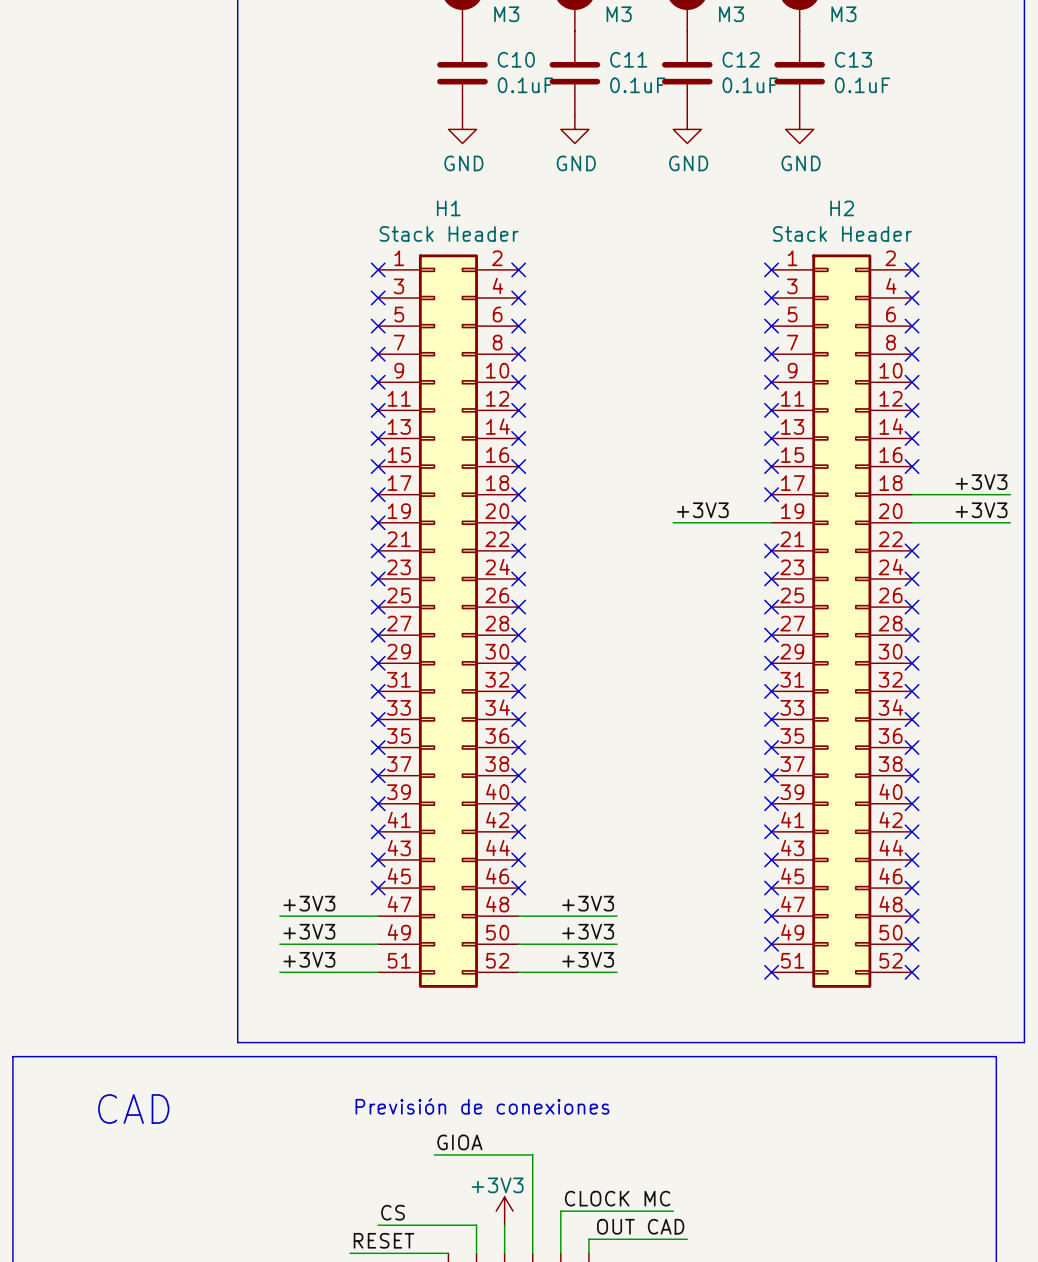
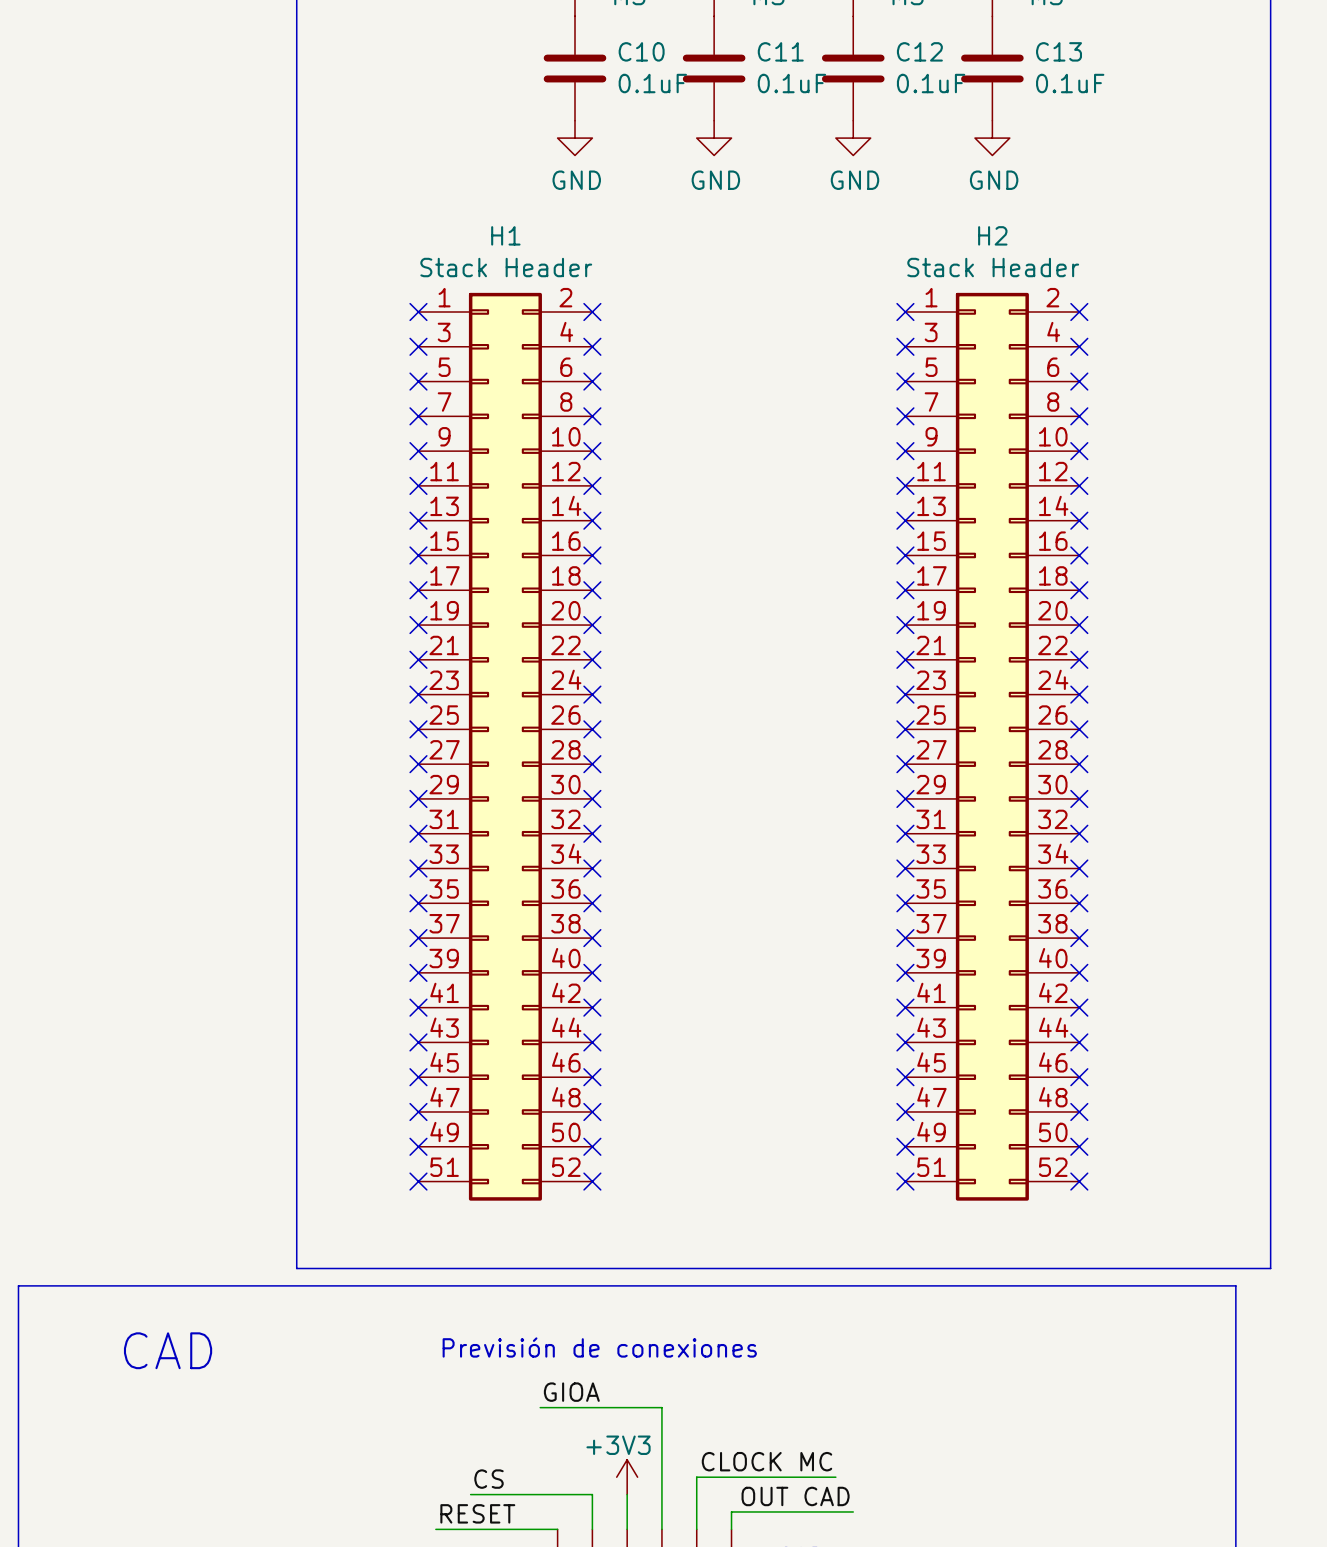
no-connect mark: none -> (418, 311)
no-connect mark: (378, 269) -> none
no-connect mark: none -> (592, 311)
no-connect mark: (518, 269) -> none
no-connect mark: none -> (905, 311)
no-connect mark: (771, 269) -> none
no-connect mark: none -> (1079, 311)
no-connect mark: (912, 269) -> none
no-connect mark: none -> (418, 346)
no-connect mark: (378, 298) -> none
no-connect mark: none -> (592, 346)
no-connect mark: (518, 298) -> none
no-connect mark: none -> (905, 346)
no-connect mark: (771, 298) -> none
no-connect mark: none -> (1079, 346)
no-connect mark: (912, 298) -> none
no-connect mark: none -> (418, 381)
no-connect mark: (378, 326) -> none
no-connect mark: none -> (592, 381)
no-connect mark: (518, 326) -> none
no-connect mark: none -> (905, 381)
no-connect mark: (771, 326) -> none
no-connect mark: none -> (1079, 381)
no-connect mark: (912, 326) -> none
no-connect mark: none -> (418, 416)
no-connect mark: (378, 354) -> none
no-connect mark: none -> (592, 416)
no-connect mark: (518, 354) -> none
no-connect mark: none -> (905, 416)
no-connect mark: (771, 354) -> none
no-connect mark: none -> (1079, 416)
no-connect mark: (912, 354) -> none
no-connect mark: none -> (418, 451)
no-connect mark: (378, 382) -> none
no-connect mark: none -> (592, 451)
no-connect mark: (518, 382) -> none
no-connect mark: none -> (905, 451)
no-connect mark: (771, 382) -> none
no-connect mark: none -> (1079, 451)
no-connect mark: (912, 382) -> none
no-connect mark: none -> (418, 485)
no-connect mark: (378, 410) -> none
no-connect mark: none -> (592, 485)
no-connect mark: (518, 410) -> none
no-connect mark: none -> (905, 485)
no-connect mark: (771, 410) -> none
no-connect mark: none -> (1079, 485)
no-connect mark: (912, 410) -> none
no-connect mark: none -> (418, 520)
no-connect mark: (378, 438) -> none
no-connect mark: none -> (592, 520)
no-connect mark: (518, 438) -> none
no-connect mark: none -> (905, 520)
no-connect mark: (771, 438) -> none
no-connect mark: none -> (1079, 520)
no-connect mark: (912, 438) -> none
no-connect mark: none -> (418, 555)
no-connect mark: (378, 466) -> none
no-connect mark: none -> (592, 555)
no-connect mark: (518, 466) -> none
no-connect mark: none -> (905, 555)
no-connect mark: (771, 466) -> none
no-connect mark: none -> (1079, 555)
no-connect mark: (912, 466) -> none
label: +3V3 (981, 482) -> none
no-connect mark: none -> (418, 590)
no-connect mark: (378, 494) -> none
no-connect mark: none -> (592, 590)
no-connect mark: (518, 494) -> none
no-connect mark: none -> (905, 590)
no-connect mark: (771, 494) -> none
no-connect mark: none -> (1079, 590)
wire: (912, 494) (1010, 494) -> none
label: +3V3 (702, 510) -> none
label: +3V3 (981, 510) -> none
no-connect mark: none -> (418, 625)
no-connect mark: (378, 522) -> none
no-connect mark: none -> (592, 625)
no-connect mark: (518, 522) -> none
wire: (673, 522) (771, 522) -> none
no-connect mark: none -> (905, 625)
no-connect mark: none -> (1079, 625)
wire: (912, 522) (1010, 522) -> none
no-connect mark: none -> (418, 659)
no-connect mark: (378, 550) -> none
no-connect mark: none -> (592, 659)
no-connect mark: (518, 550) -> none
no-connect mark: none -> (905, 659)
no-connect mark: (771, 550) -> none
no-connect mark: none -> (1079, 659)
no-connect mark: (912, 550) -> none
no-connect mark: none -> (418, 694)
no-connect mark: (378, 578) -> none
no-connect mark: none -> (592, 694)
no-connect mark: (518, 578) -> none
no-connect mark: none -> (905, 694)
no-connect mark: (771, 578) -> none
no-connect mark: none -> (1079, 694)
no-connect mark: (912, 578) -> none
no-connect mark: none -> (418, 729)
no-connect mark: (378, 607) -> none
no-connect mark: none -> (592, 729)
no-connect mark: (518, 607) -> none
no-connect mark: none -> (905, 729)
no-connect mark: (771, 607) -> none
no-connect mark: none -> (1079, 729)
no-connect mark: (912, 607) -> none
H1 position: (448, 621) -> (505, 746)
H2 position: (841, 621) -> (992, 746)
no-connect mark: none -> (418, 764)
no-connect mark: (378, 635) -> none
no-connect mark: none -> (592, 764)
no-connect mark: (518, 635) -> none
no-connect mark: none -> (905, 764)
no-connect mark: (771, 635) -> none
no-connect mark: none -> (1079, 764)
no-connect mark: (912, 635) -> none
no-connect mark: none -> (418, 798)
no-connect mark: (378, 663) -> none
no-connect mark: none -> (592, 798)
no-connect mark: (518, 663) -> none
no-connect mark: none -> (905, 798)
no-connect mark: (771, 663) -> none
no-connect mark: none -> (1079, 798)
no-connect mark: (912, 663) -> none
no-connect mark: none -> (418, 833)
no-connect mark: (378, 691) -> none
no-connect mark: none -> (592, 833)
no-connect mark: (518, 691) -> none
no-connect mark: none -> (905, 833)
no-connect mark: (771, 691) -> none
no-connect mark: none -> (1079, 833)
no-connect mark: (912, 691) -> none
no-connect mark: none -> (418, 868)
no-connect mark: (378, 719) -> none
no-connect mark: none -> (592, 868)
no-connect mark: (518, 719) -> none
no-connect mark: none -> (905, 868)
no-connect mark: (771, 719) -> none
no-connect mark: none -> (1079, 868)
no-connect mark: (912, 719) -> none
no-connect mark: none -> (418, 903)
no-connect mark: (378, 747) -> none
no-connect mark: none -> (592, 903)
no-connect mark: (518, 747) -> none
no-connect mark: none -> (905, 903)
no-connect mark: (771, 747) -> none
no-connect mark: none -> (1079, 903)
no-connect mark: (912, 747) -> none
no-connect mark: none -> (418, 938)
no-connect mark: (378, 775) -> none
no-connect mark: none -> (592, 938)
no-connect mark: (518, 775) -> none
no-connect mark: none -> (905, 938)
no-connect mark: (771, 775) -> none
no-connect mark: none -> (1079, 938)
no-connect mark: (912, 775) -> none
no-connect mark: none -> (418, 972)
no-connect mark: (378, 803) -> none
no-connect mark: none -> (592, 972)
no-connect mark: (518, 803) -> none
no-connect mark: none -> (905, 972)
no-connect mark: (771, 803) -> none
no-connect mark: none -> (1079, 972)
no-connect mark: (912, 803) -> none
no-connect mark: none -> (418, 1007)
no-connect mark: (378, 831) -> none
no-connect mark: none -> (592, 1007)
no-connect mark: (518, 831) -> none
no-connect mark: none -> (905, 1007)
no-connect mark: (771, 831) -> none
no-connect mark: none -> (1079, 1007)
no-connect mark: (912, 831) -> none
no-connect mark: none -> (418, 1042)
no-connect mark: (378, 859) -> none
no-connect mark: none -> (592, 1042)
no-connect mark: (518, 859) -> none
no-connect mark: none -> (905, 1042)
no-connect mark: (771, 859) -> none
no-connect mark: none -> (1079, 1042)
no-connect mark: (912, 859) -> none
no-connect mark: none -> (418, 1077)
no-connect mark: (378, 888) -> none
no-connect mark: none -> (592, 1077)
no-connect mark: (518, 888) -> none
no-connect mark: none -> (905, 1077)
no-connect mark: (771, 888) -> none
no-connect mark: none -> (1079, 1077)
no-connect mark: (912, 888) -> none
label: +3V3 (309, 903) -> none
label: +3V3 (588, 903) -> none
wire: (279, 916) (378, 916) -> none
no-connect mark: none -> (418, 1111)
no-connect mark: none -> (592, 1111)
wire: (518, 916) (617, 916) -> none
no-connect mark: none -> (905, 1111)
no-connect mark: (771, 916) -> none
no-connect mark: none -> (1079, 1111)
no-connect mark: (912, 916) -> none
label: +3V3 (309, 931) -> none
label: +3V3 (588, 931) -> none
wire: (279, 944) (378, 944) -> none
no-connect mark: none -> (418, 1146)
no-connect mark: none -> (592, 1146)
wire: (518, 944) (617, 944) -> none
no-connect mark: none -> (905, 1146)
no-connect mark: (771, 944) -> none
no-connect mark: none -> (1079, 1146)
no-connect mark: (912, 944) -> none
label: +3V3 (309, 959) -> none
label: +3V3 (588, 959) -> none
wire: (279, 972) (378, 972) -> none
no-connect mark: none -> (418, 1181)
no-connect mark: none -> (592, 1181)
wire: (518, 972) (617, 972) -> none
no-connect mark: none -> (905, 1181)
no-connect mark: (771, 972) -> none
no-connect mark: none -> (1079, 1181)
no-connect mark: (912, 972) -> none

